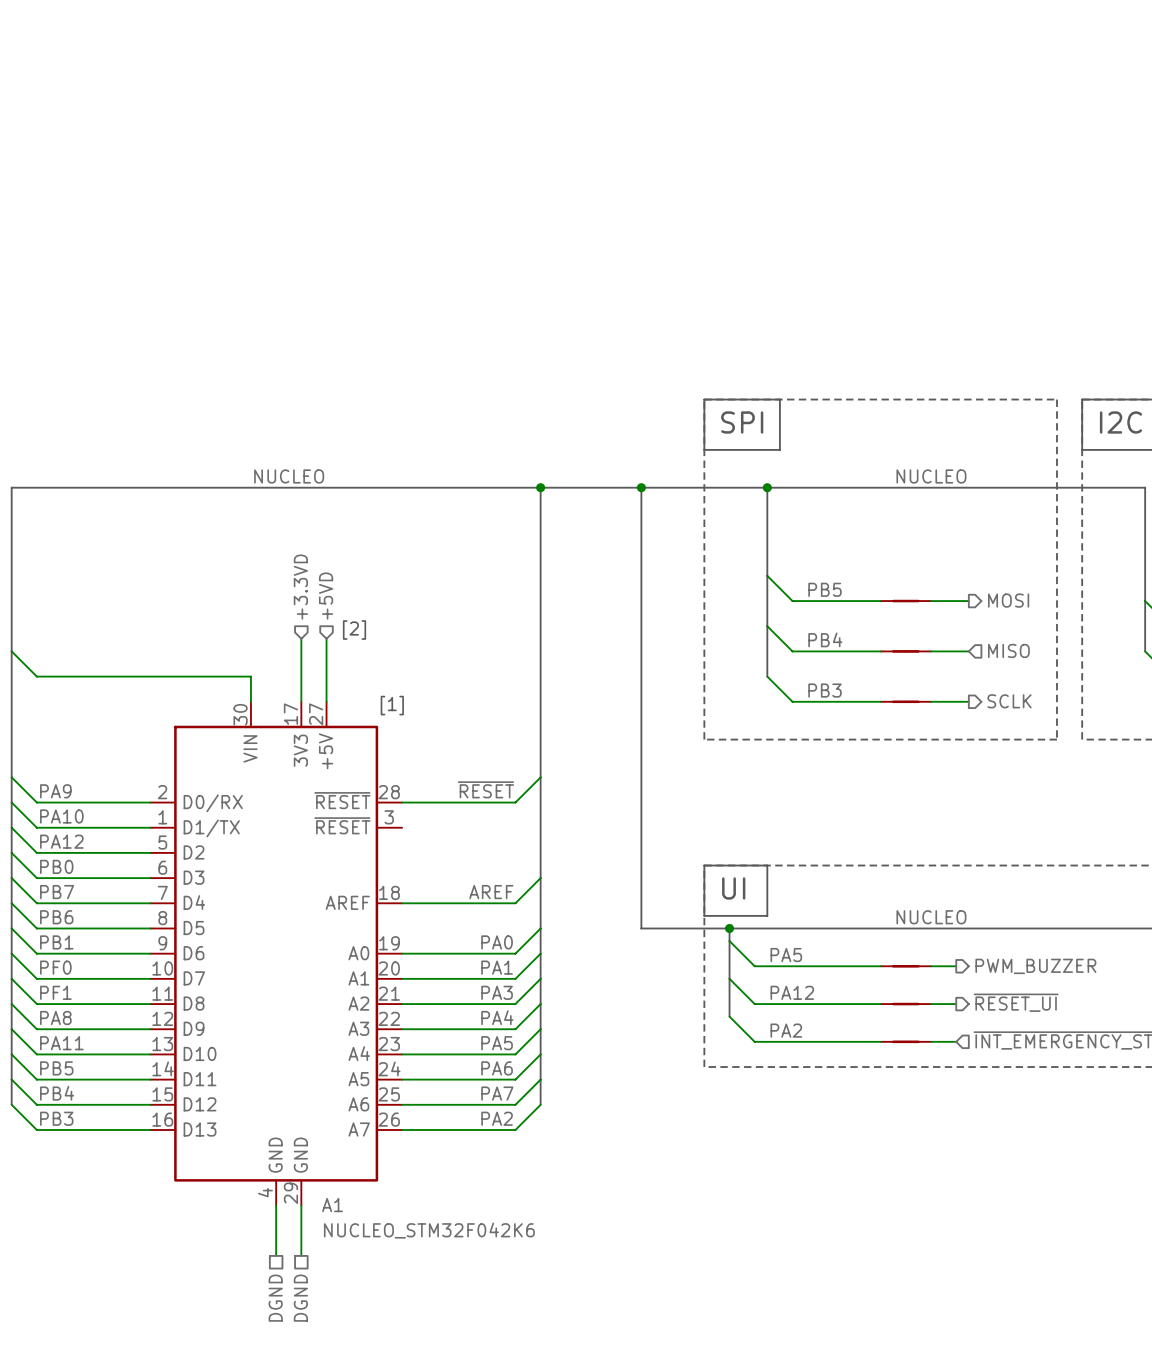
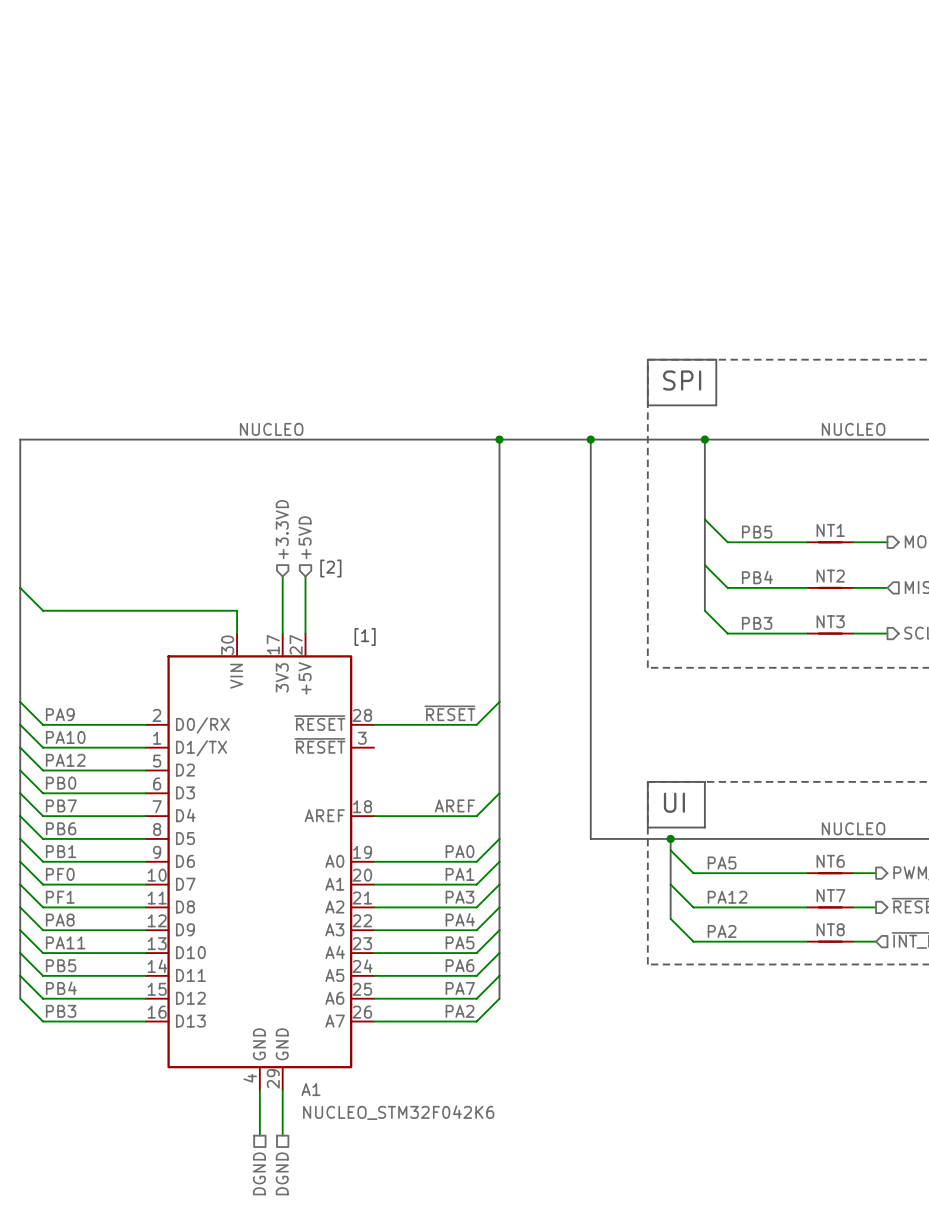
NT1 name: none -> NT1 (830, 530)
NT2 name: none -> NT2 (830, 576)
NT3 name: none -> NT3 (830, 621)
NT6 name: none -> NT6 (830, 861)
NT7 name: none -> NT7 (830, 895)
NT8 name: none -> NT8 (830, 929)

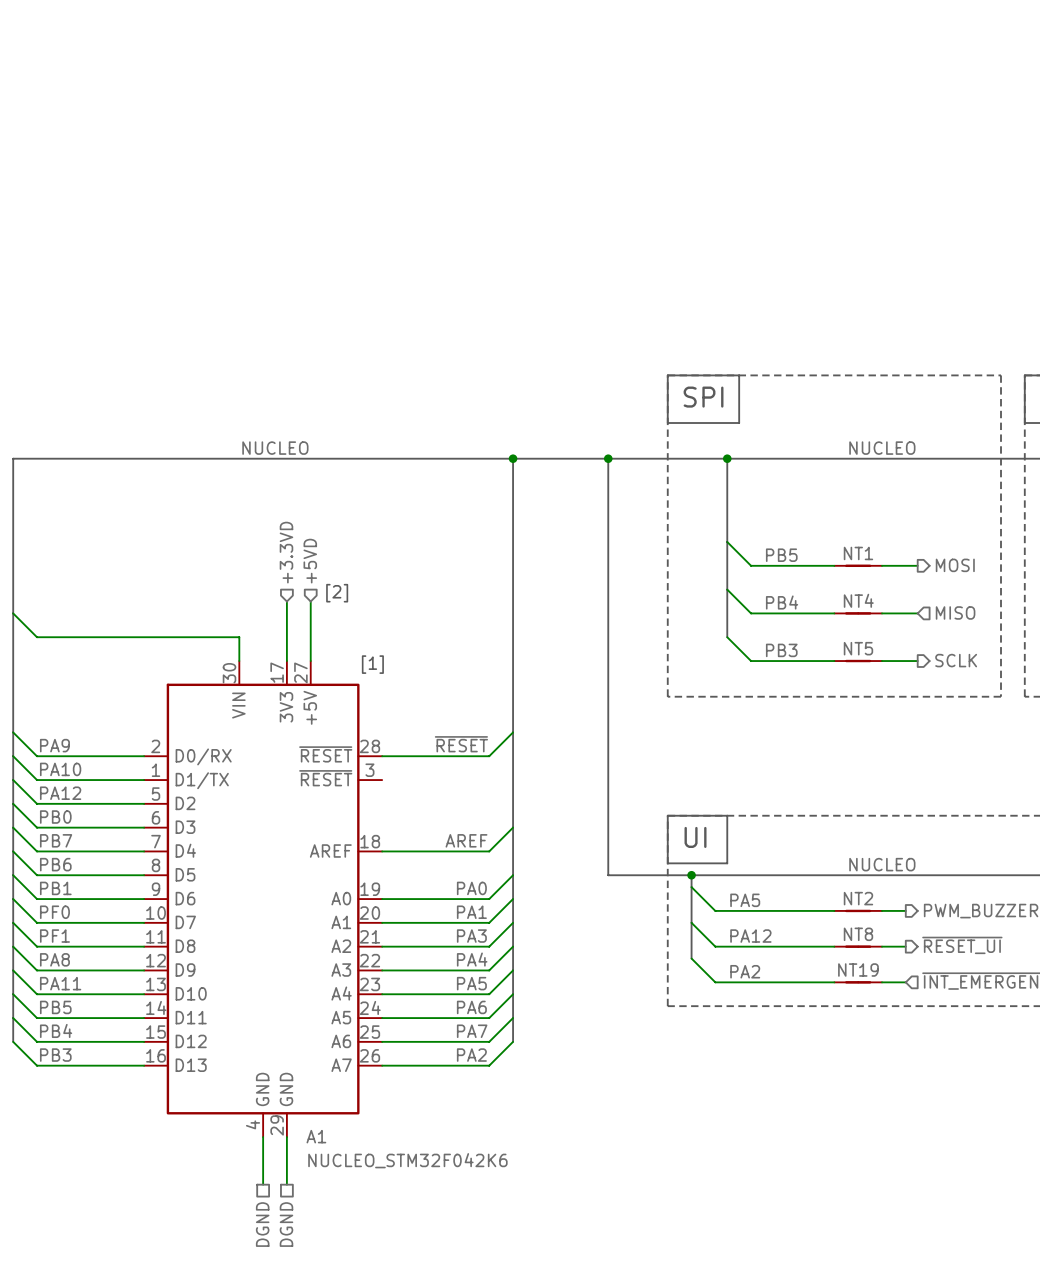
NT2 name: NT2 (830, 576) -> NT4 (858, 600)
NT3 name: NT3 (830, 621) -> NT5 (858, 648)
NT6 name: NT6 (830, 861) -> NT2 (858, 898)
NT7 name: NT7 (830, 895) -> NT8 (858, 934)
NT8 name: NT8 (830, 929) -> NT19 (858, 970)

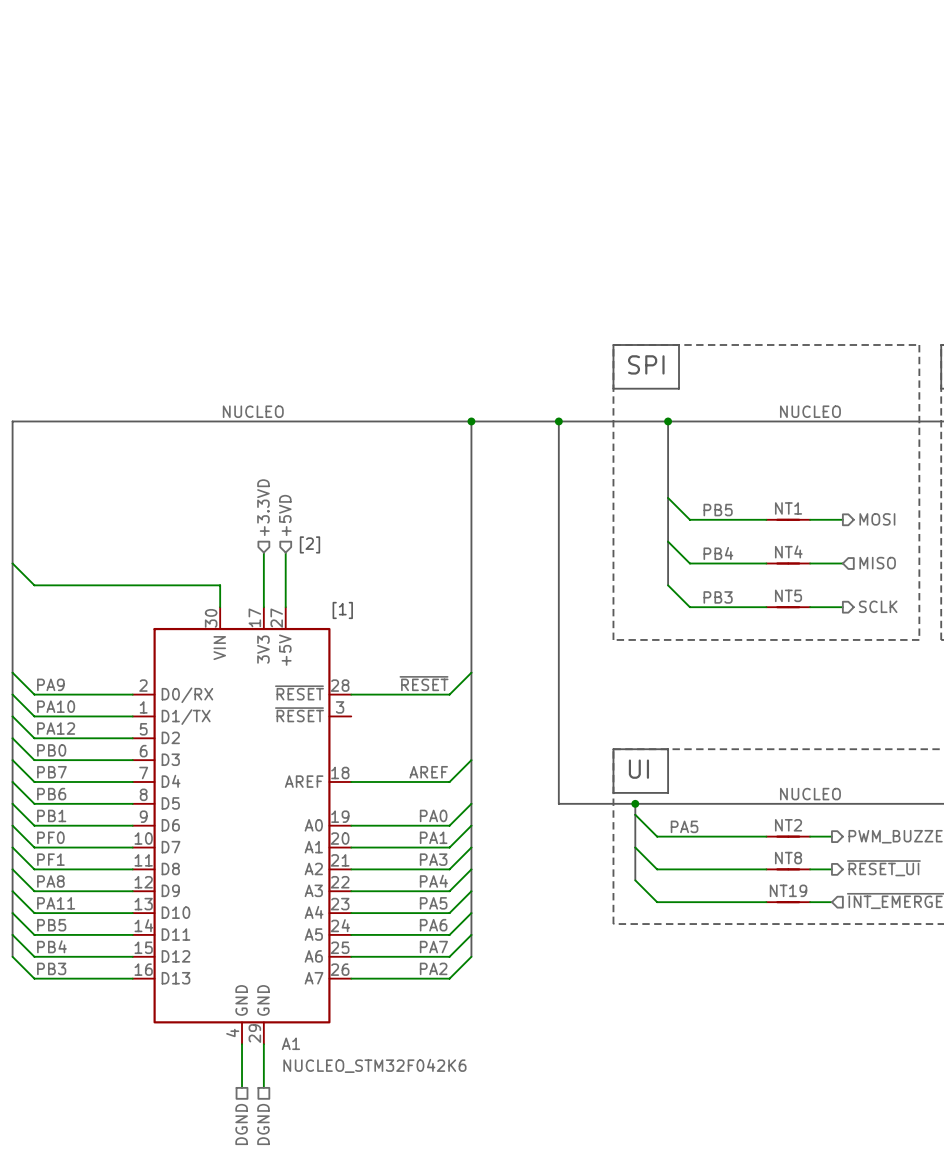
label: PA12 (750, 936) -> none
label: PA2 (745, 971) -> none

